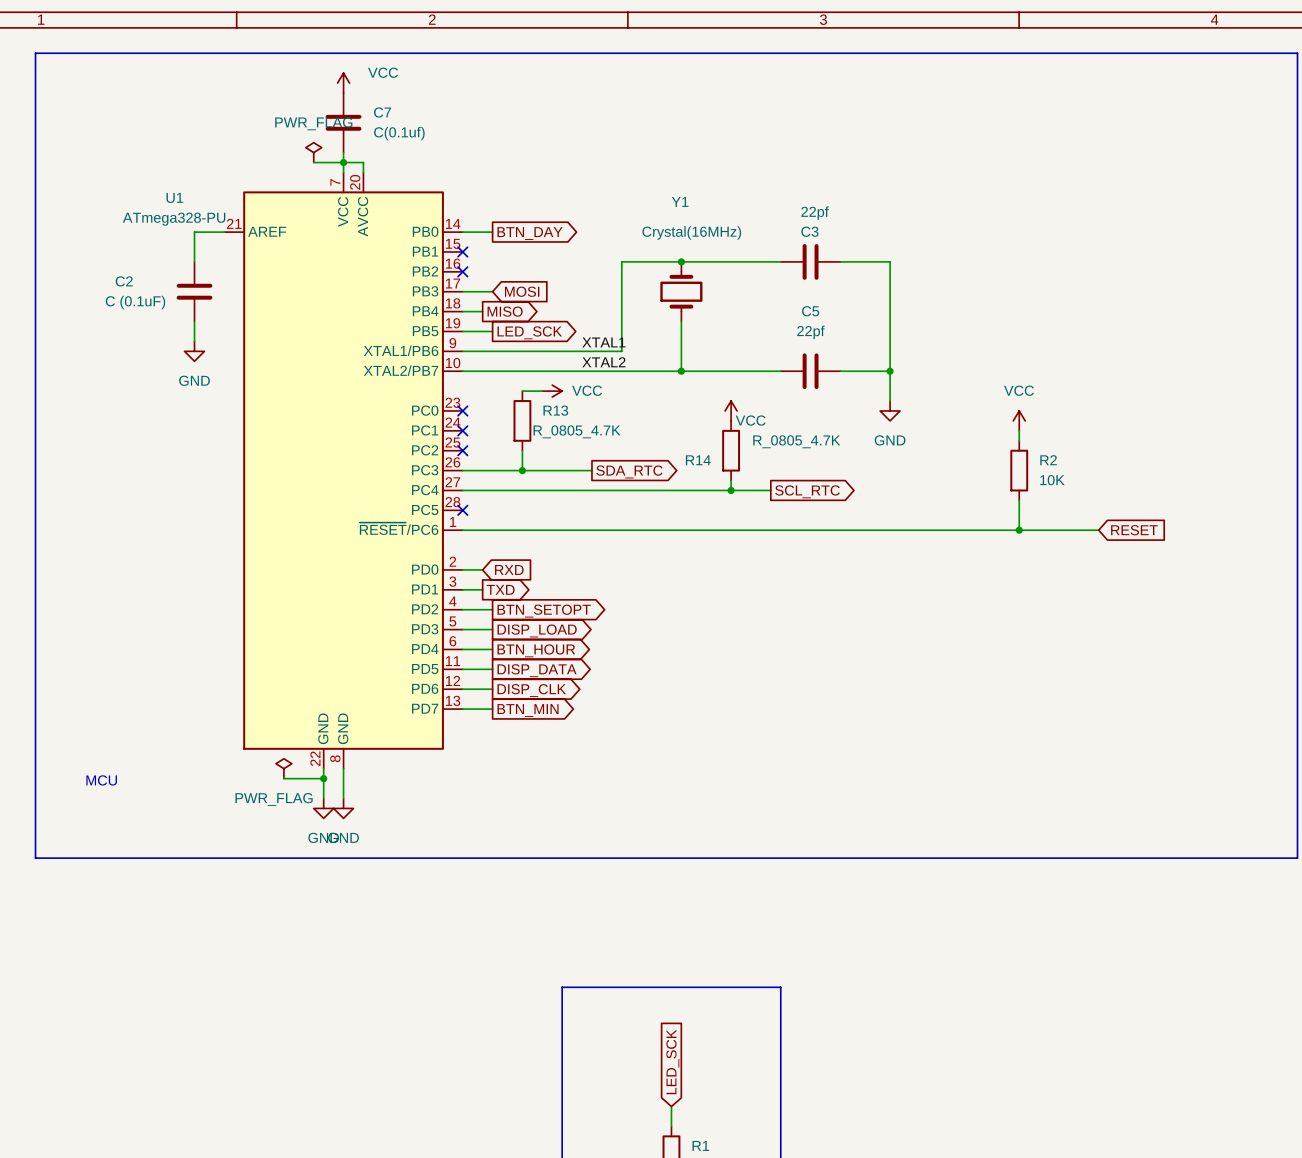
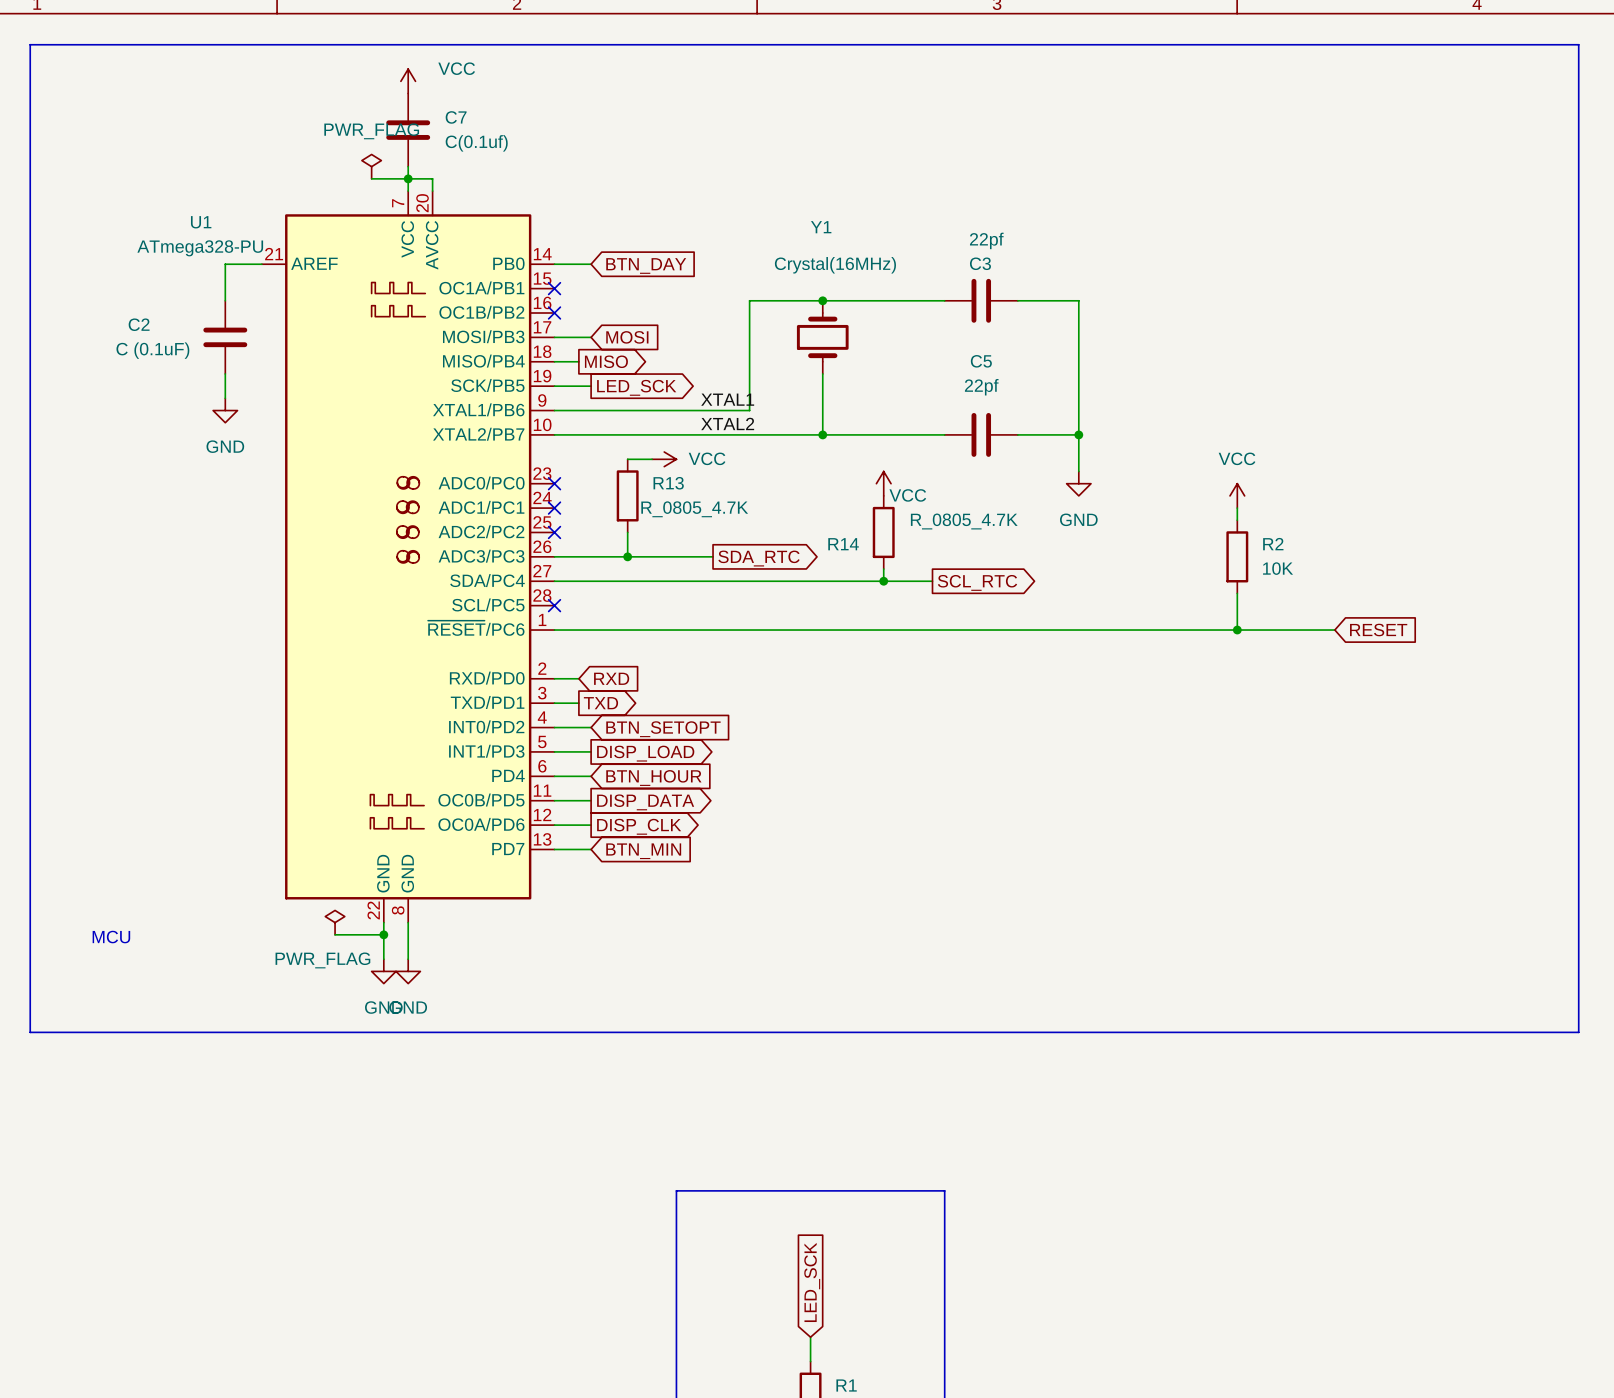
U1 symbol: [224, 172, 463, 769] -> [261, 191, 555, 923]
global label shape: output (530, 233) -> input (646, 265)
global label shape: output (544, 611) -> input (663, 729)
global label shape: output (536, 650) -> input (653, 778)
global label shape: output (528, 710) -> input (643, 851)

